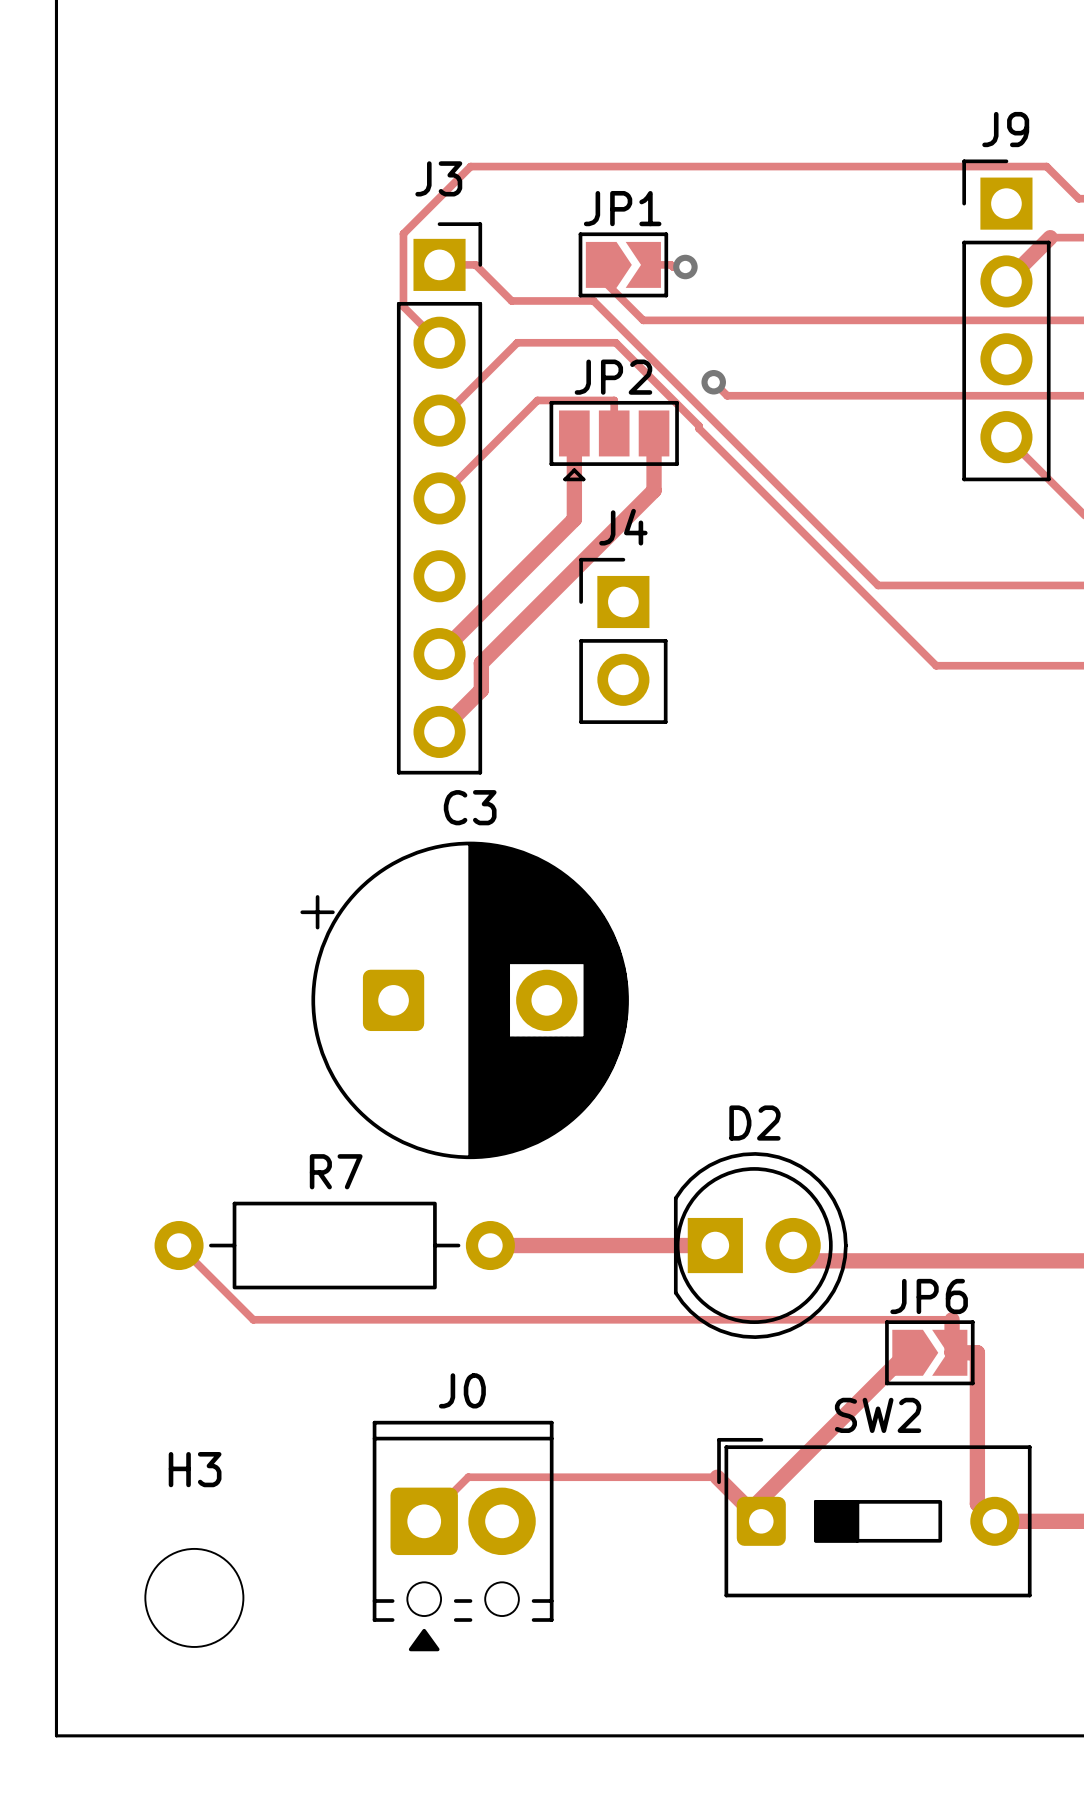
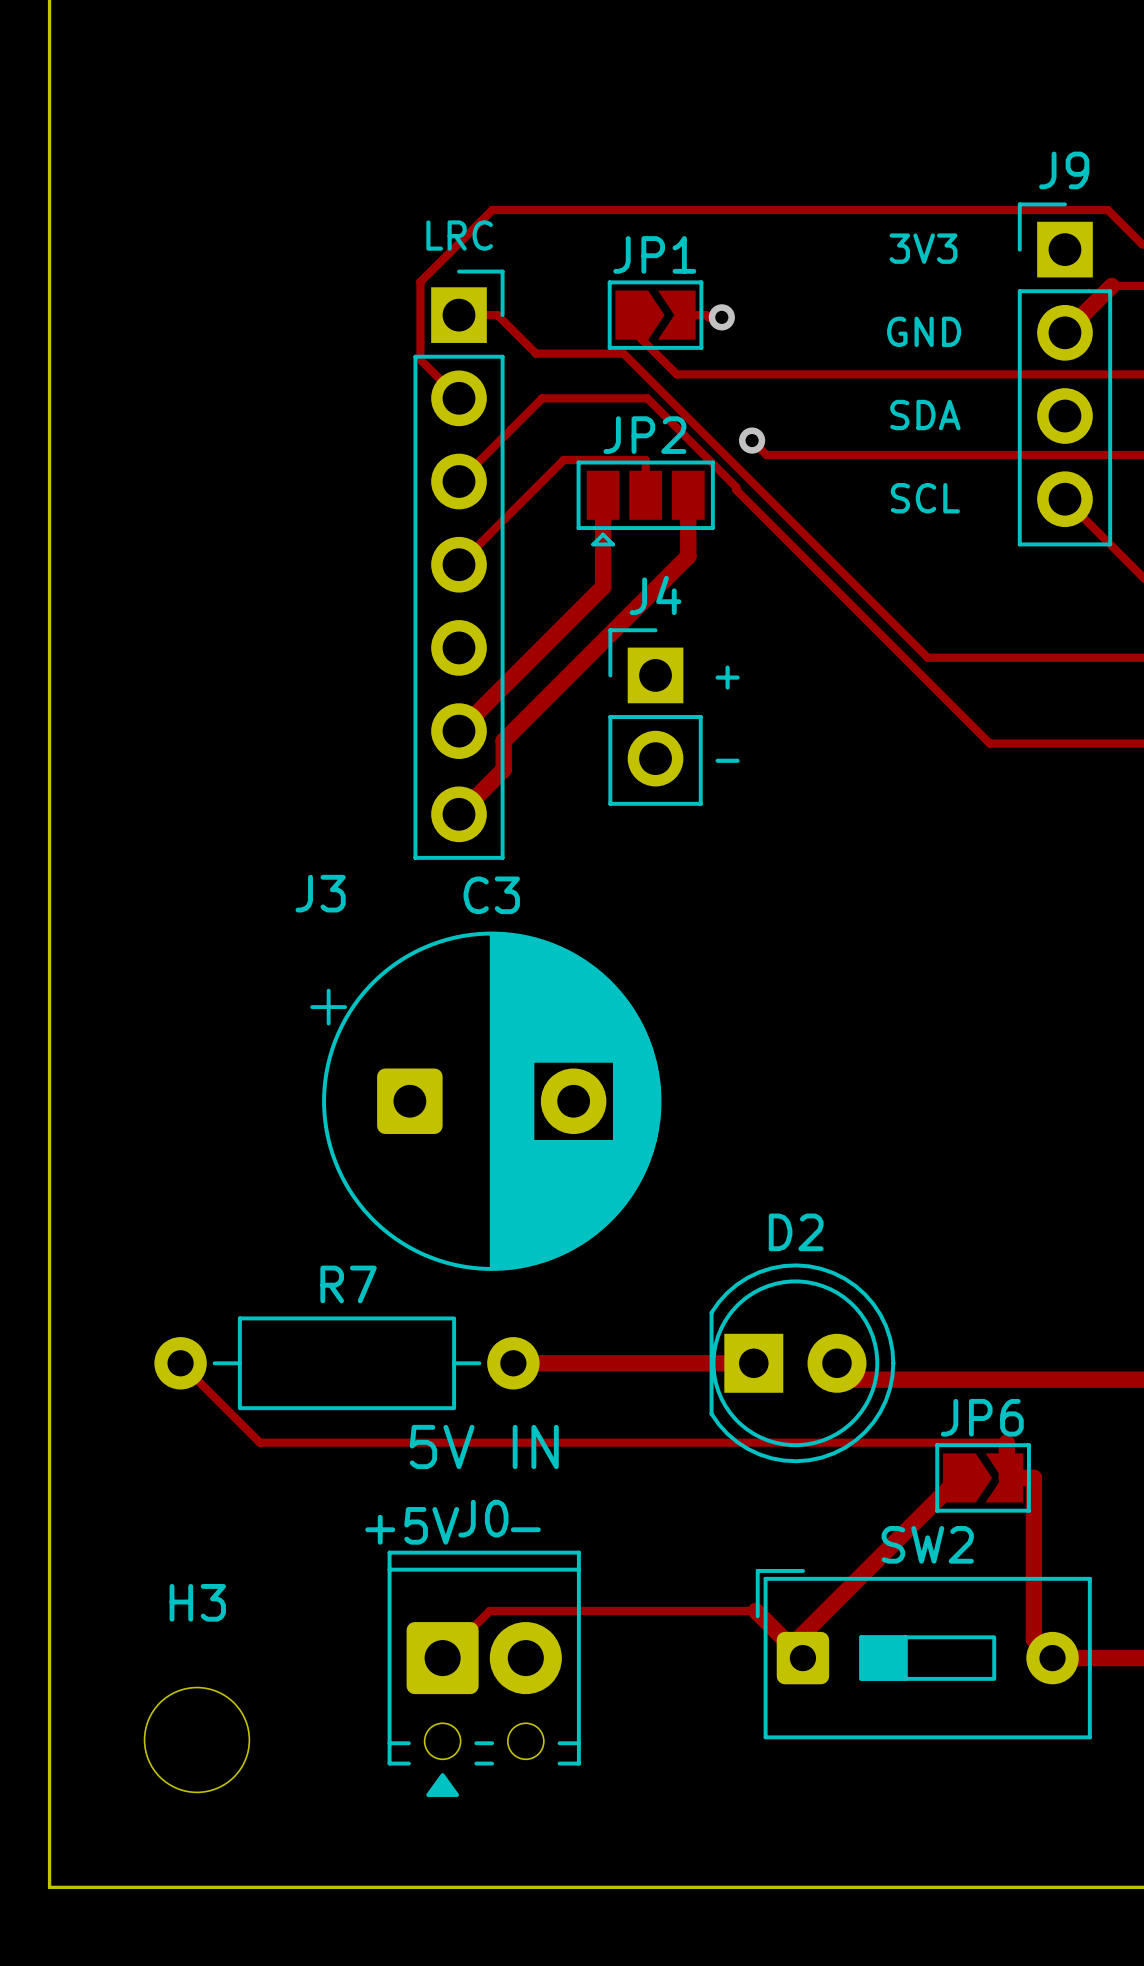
J3 name position: J3 (438, 178) -> J3 (320, 893)
text: none -> LRC (459, 235)
text: none -> 3V3 (923, 248)
text: none -> GND (924, 331)
text: none -> SDA (925, 415)
text: none -> SCL (925, 498)
text: none -> + (727, 677)
text: none -> - (727, 760)
text: none -> 5V IN (484, 1446)
text: none -> +5V (412, 1525)
text: none -> - (525, 1529)

